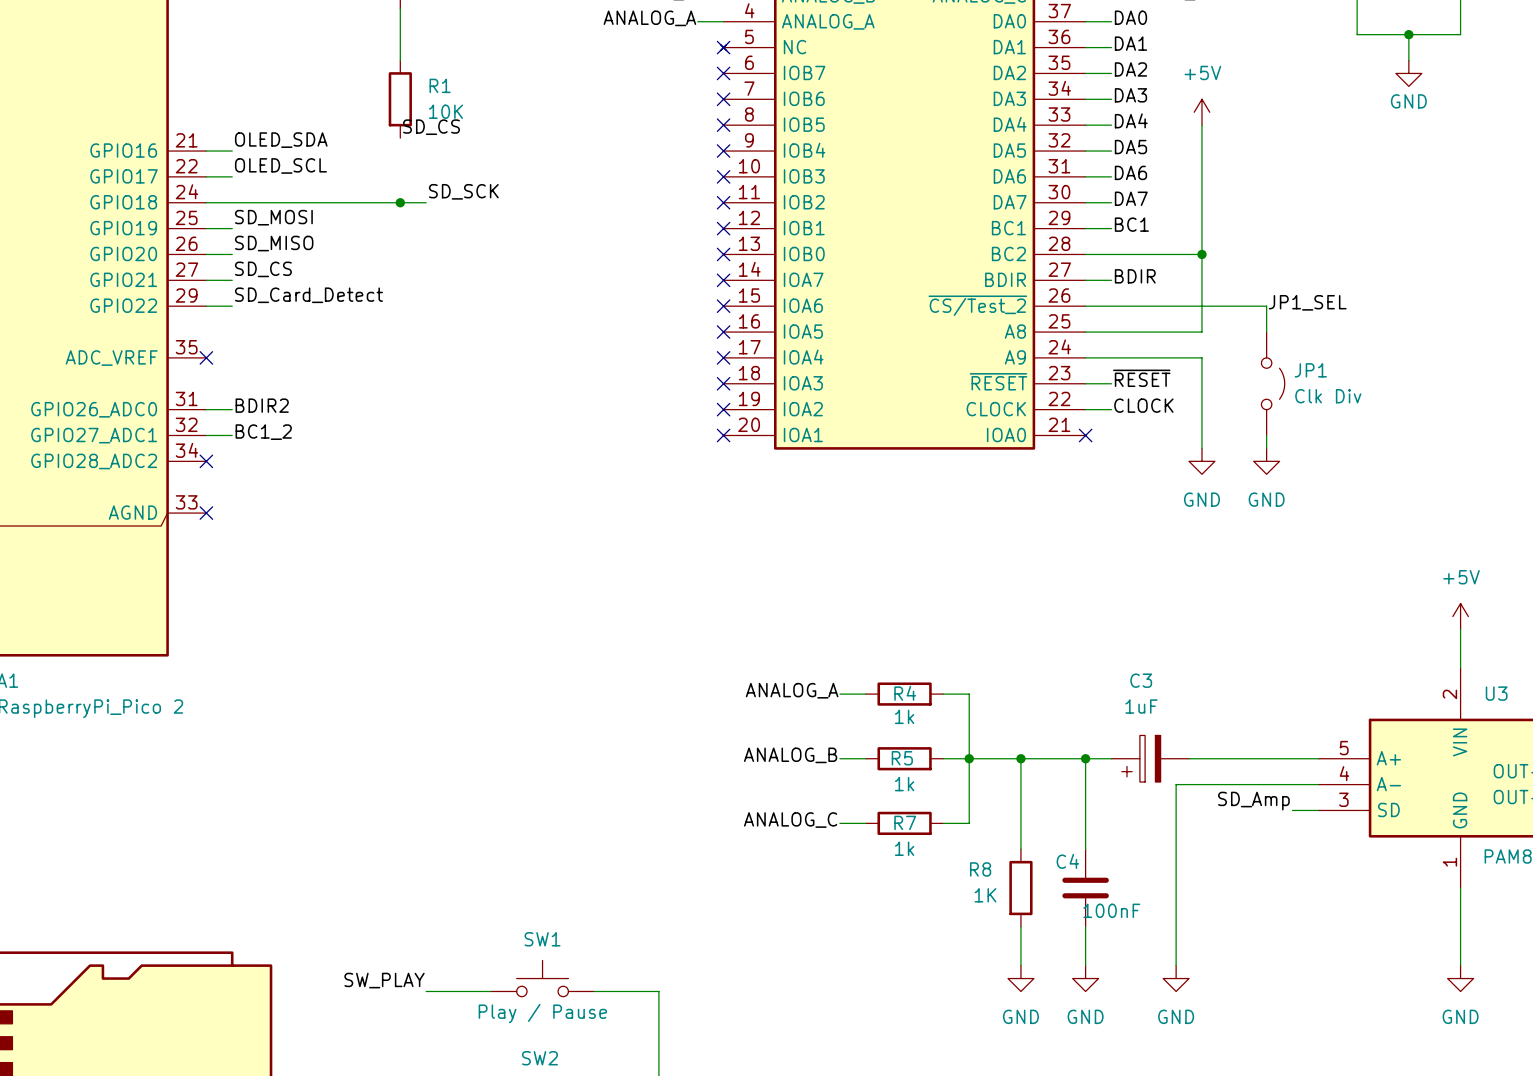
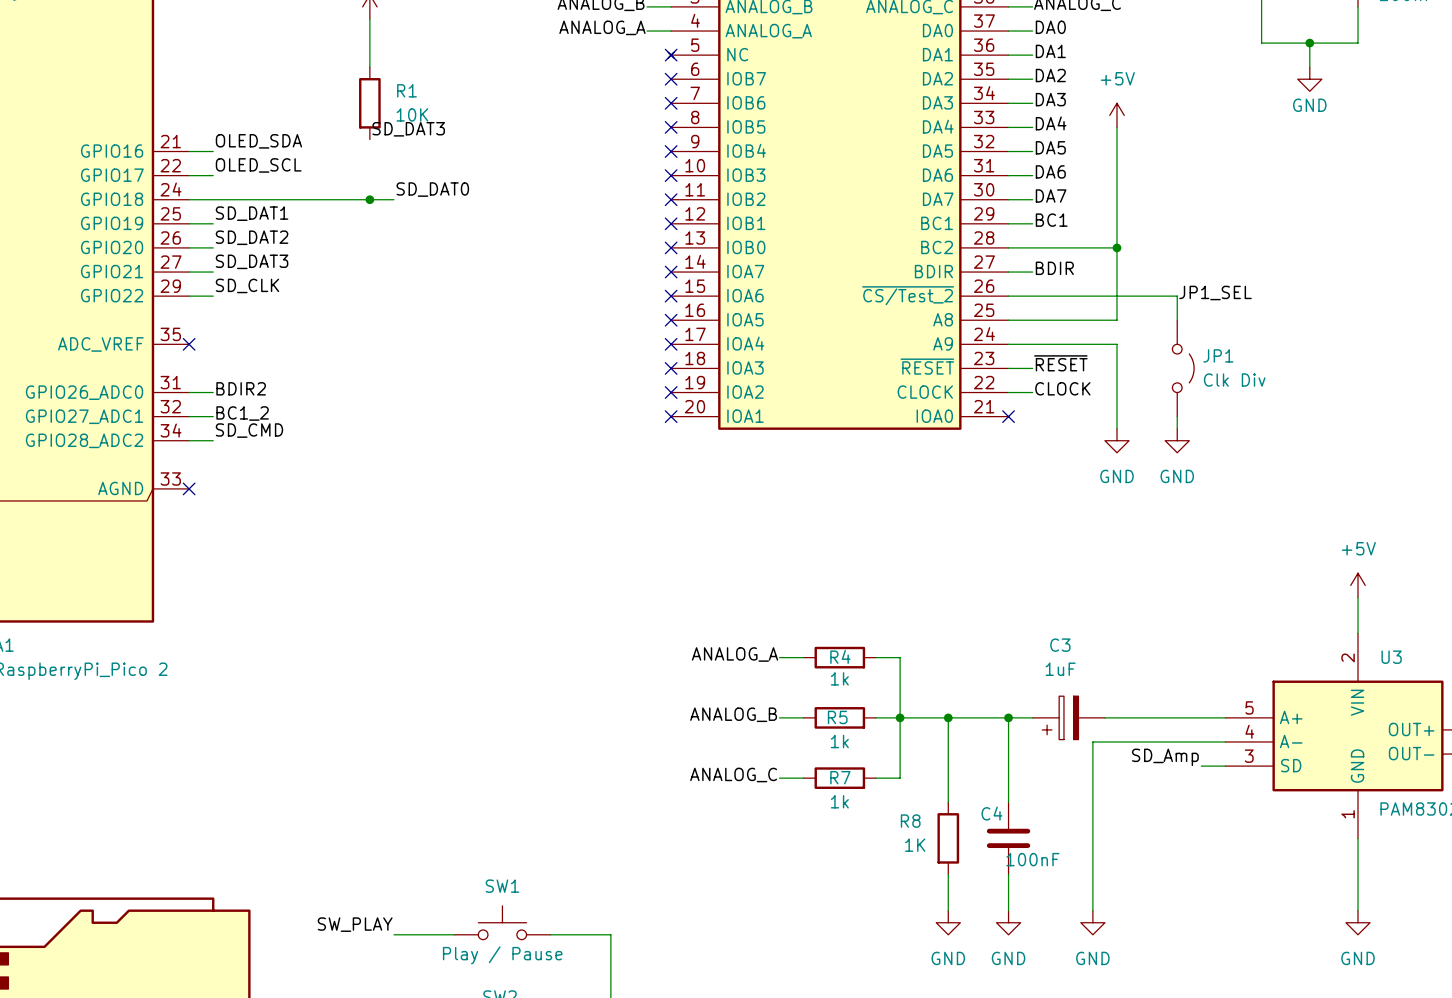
label: SD_CS (431, 127) -> SD_DAT3 (408, 129)
label: SD_SCK (463, 191) -> SD_DAT0 (432, 189)
label: SD_MOSI (273, 217) -> SD_DAT1 (252, 213)
label: SD_MISO (274, 243) -> SD_DAT2 (252, 237)
label: SD_CS (263, 269) -> SD_DAT3 (252, 261)
label: SD_Card_Detect (308, 295) -> SD_CLK (247, 285)
label: none -> SD_CMD (249, 430)
wire: none -> (189, 440) (213, 440)
no-connect mark: (206, 461) -> none

